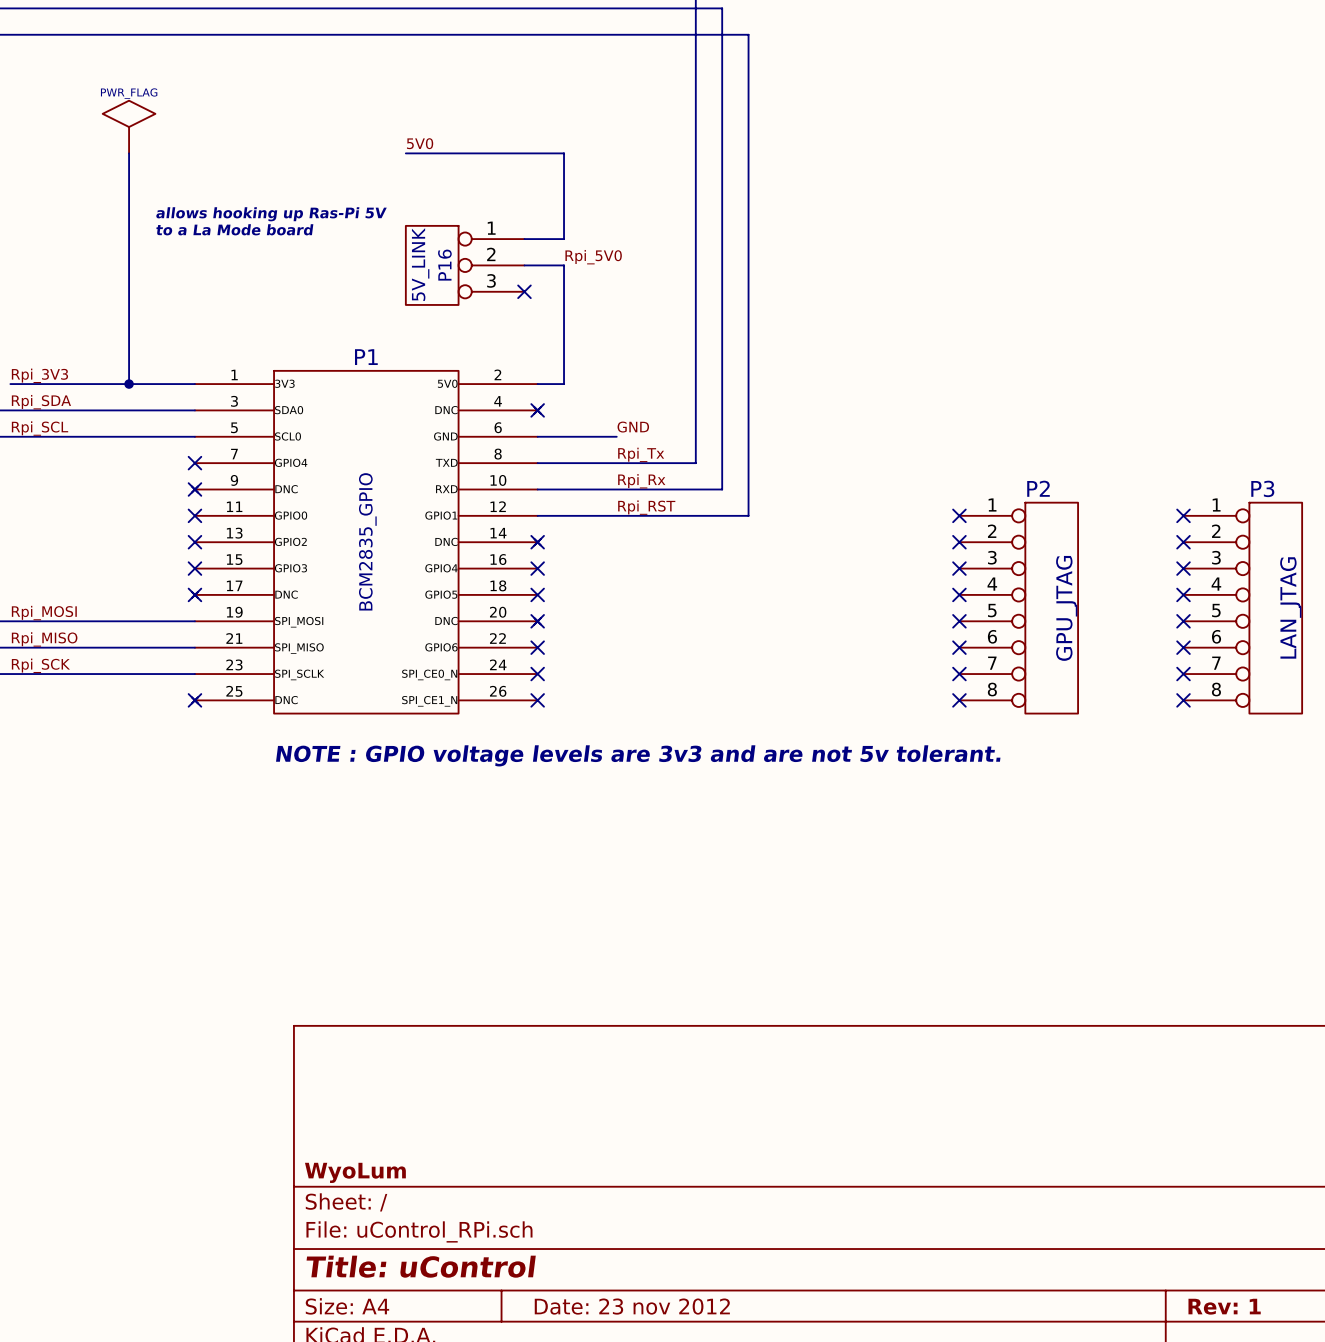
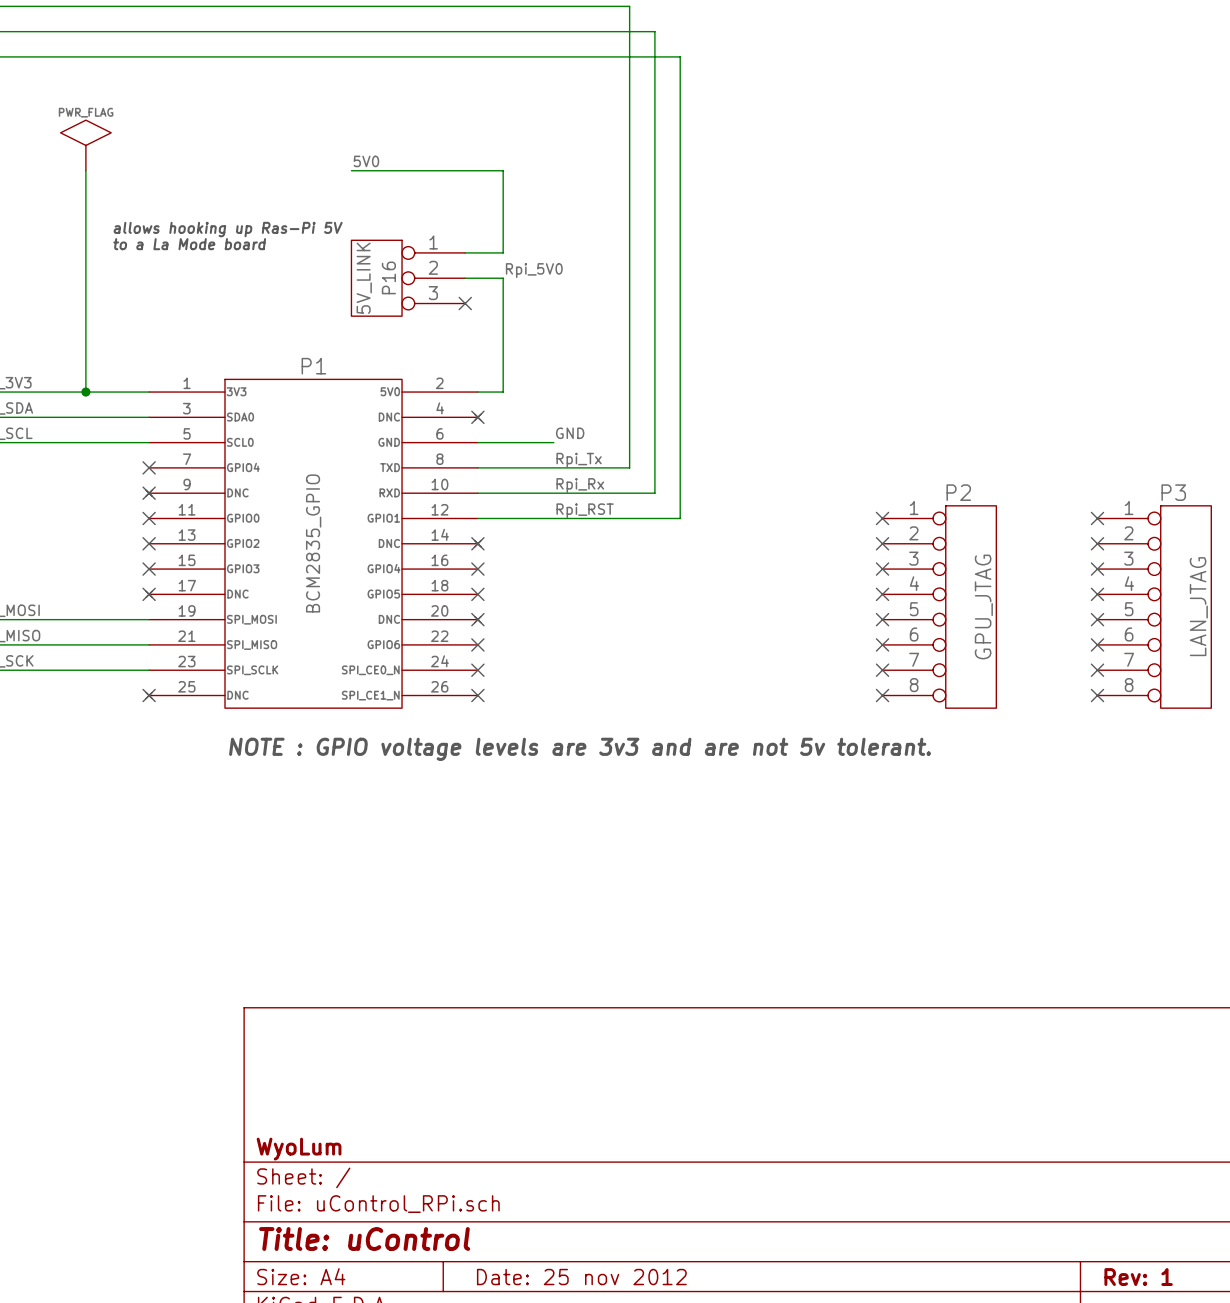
title block: Date: 23 nov 2012 (632, 1306) -> Date: 25 nov 2012 (581, 1277)

